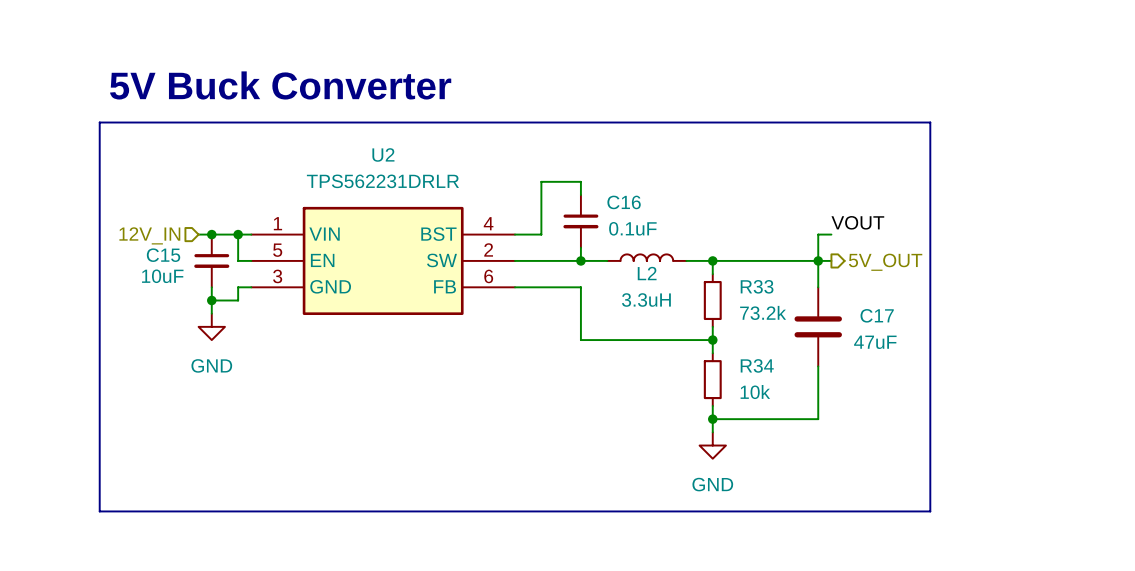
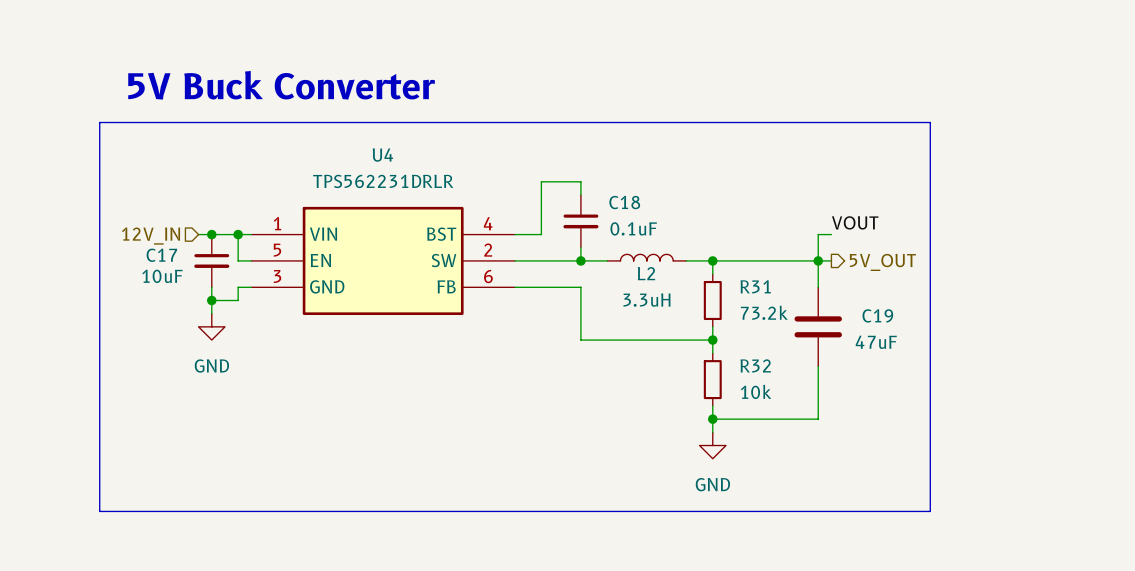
U2 name: U2 (383, 154) -> U4 (382, 155)
C16 name: C16 (624, 202) -> C18 (624, 202)
C15 name: C15 (163, 255) -> C17 (161, 255)
R33 name: R33 (757, 286) -> R31 (755, 286)
C17 name: C17 (877, 315) -> C19 (877, 315)
R34 name: R34 (757, 365) -> R32 (755, 365)

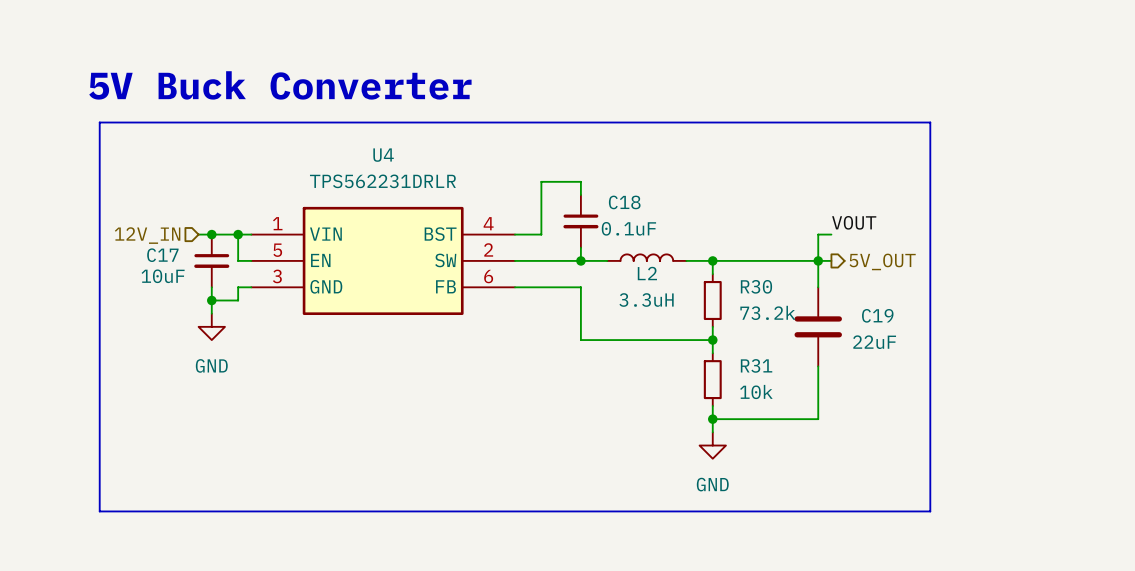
R31 name: R31 (755, 286) -> R30 (756, 286)
C19 value: 47uF (876, 342) -> 22uF (874, 342)
R32 name: R32 (755, 365) -> R31 (756, 365)

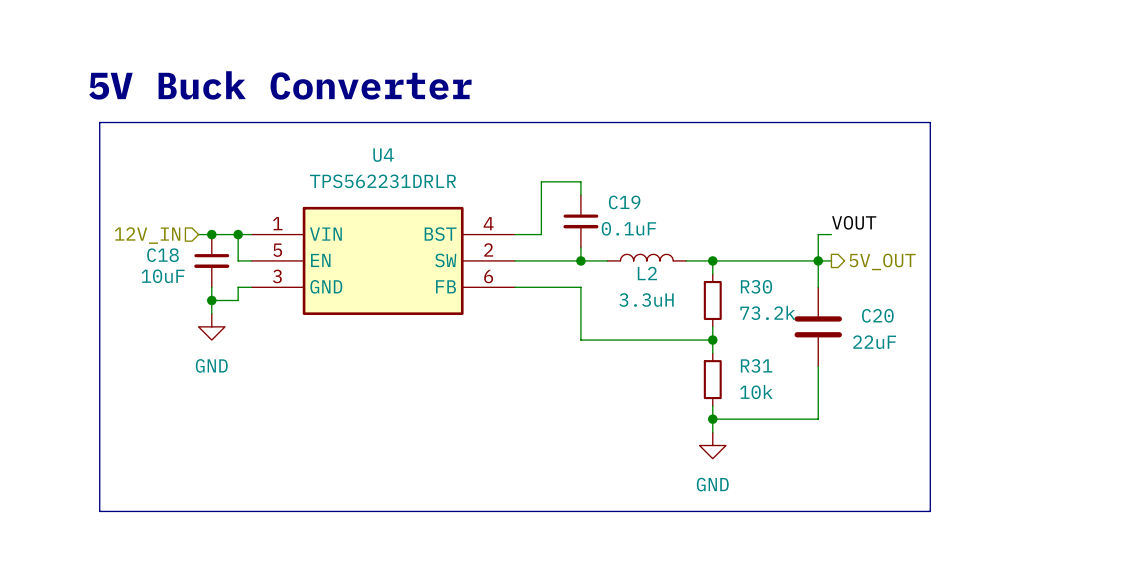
C18 name: C18 (624, 202) -> C19 (624, 202)
C17 name: C17 (162, 255) -> C18 (163, 255)
C19 name: C19 (877, 315) -> C20 (877, 315)

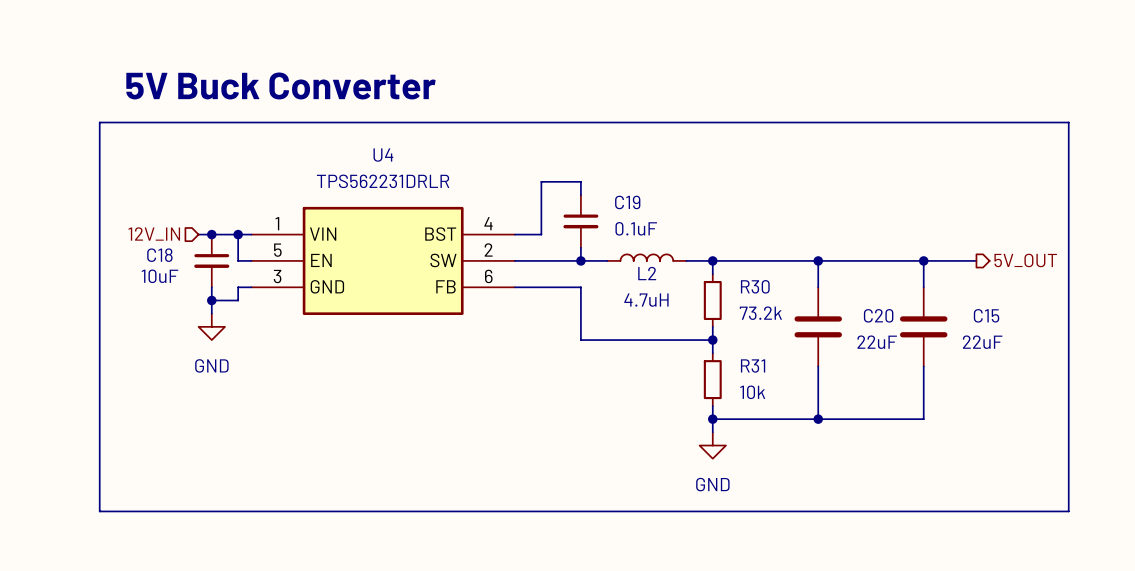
line: (930, 122) (930, 511) -> (930, 122) (1068, 122) (1068, 511) (930, 511)
label: VOUT (854, 222) -> none
wire: (831, 234) (818, 234) (818, 260) -> none
wire: none -> (831, 260) (976, 260)
wire: none -> (923, 260) (923, 287)
junction: none -> (923, 260)
hierarchical label position: 5V_OUT (882, 261) -> 5V_OUT (1025, 260)
L2 value: 3.3uH (646, 300) -> 4.7uH (646, 300)
C15: none -> 22uF (923, 326)
wire: none -> (923, 366) (923, 419) (818, 419)
junction: none -> (818, 419)

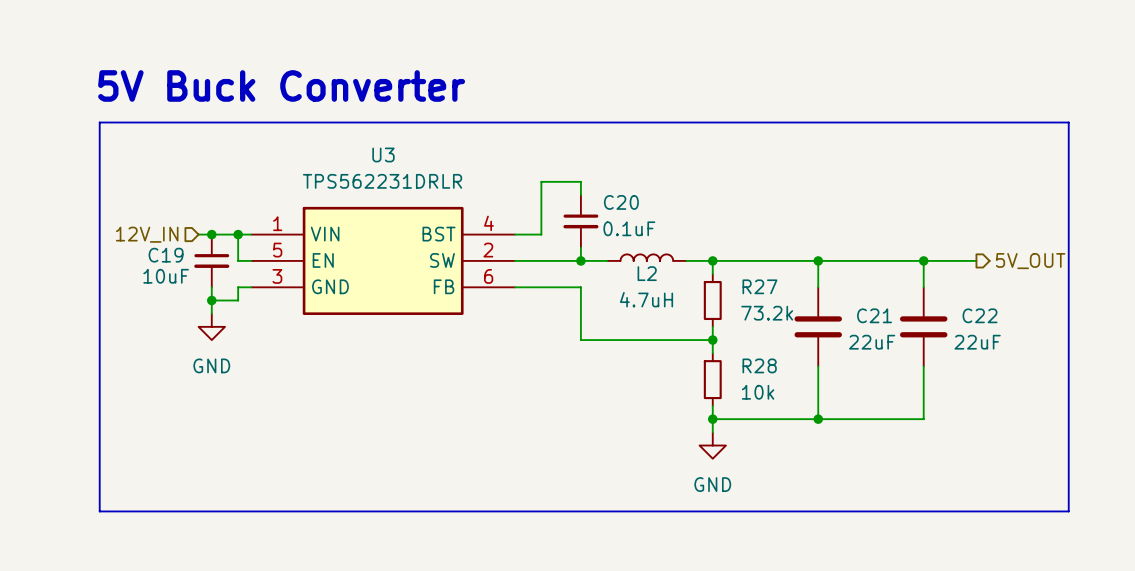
U4 name: U4 (383, 155) -> U3 (383, 154)
C19 name: C19 (627, 202) -> C20 (621, 202)
C18 name: C18 (159, 255) -> C19 (166, 255)
R30 name: R30 (755, 286) -> R27 (759, 286)
C20 name: C20 (878, 315) -> C21 (874, 315)
C15 name: C15 (986, 315) -> C22 (979, 315)
R31 name: R31 (753, 366) -> R28 (759, 365)

